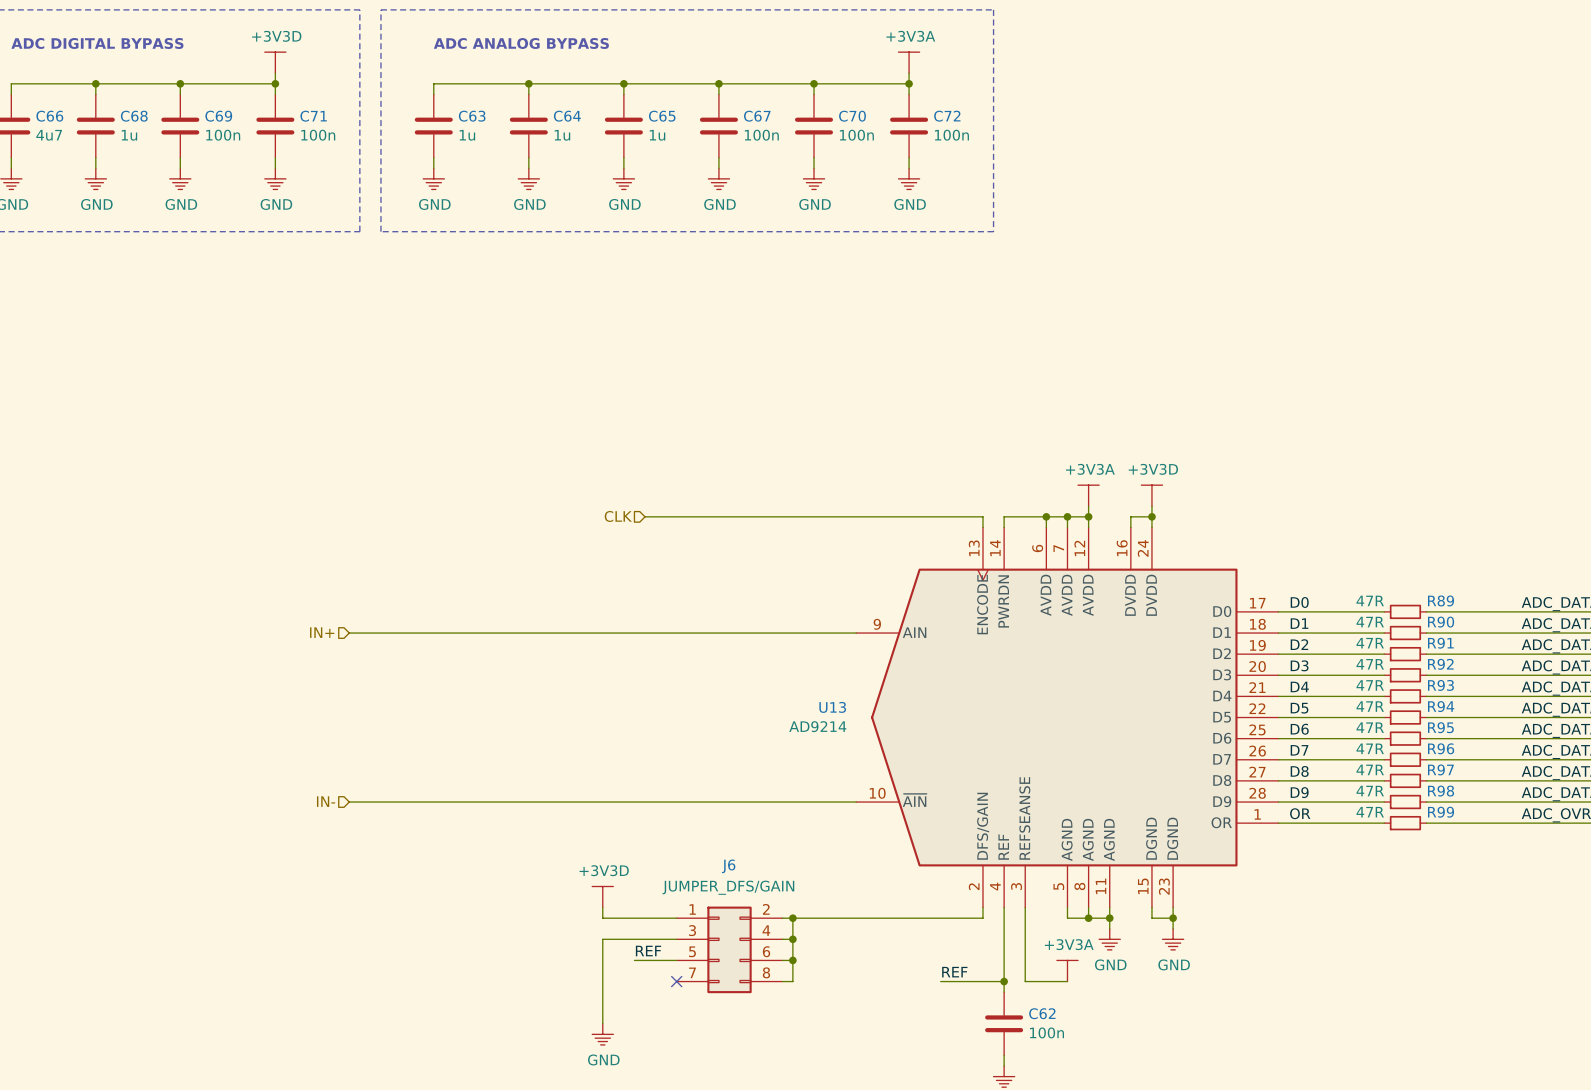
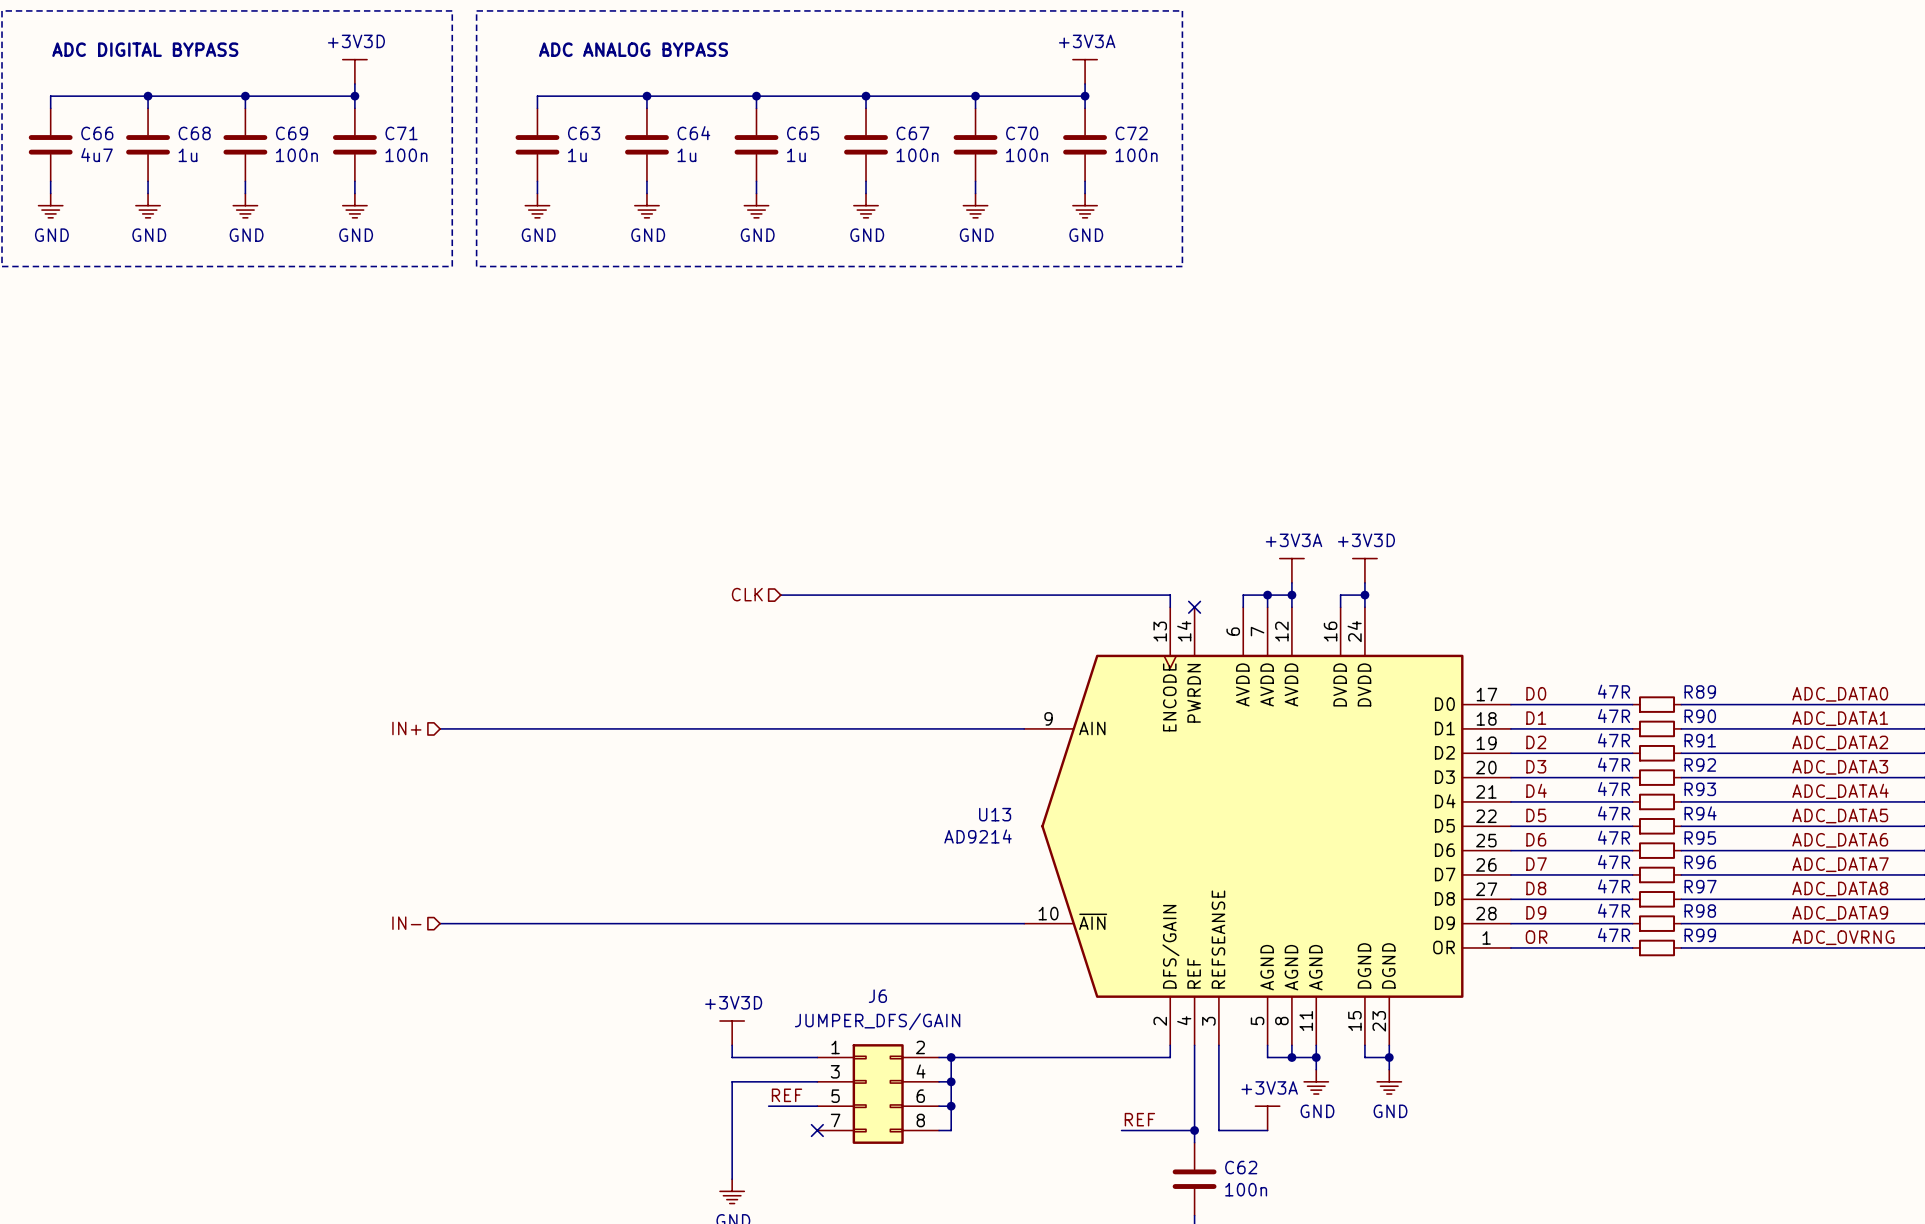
wire: (1046, 516) (1004, 516) (1004, 527) -> none
junction: (1046, 516) -> none
no-connect mark: none -> (1194, 607)

